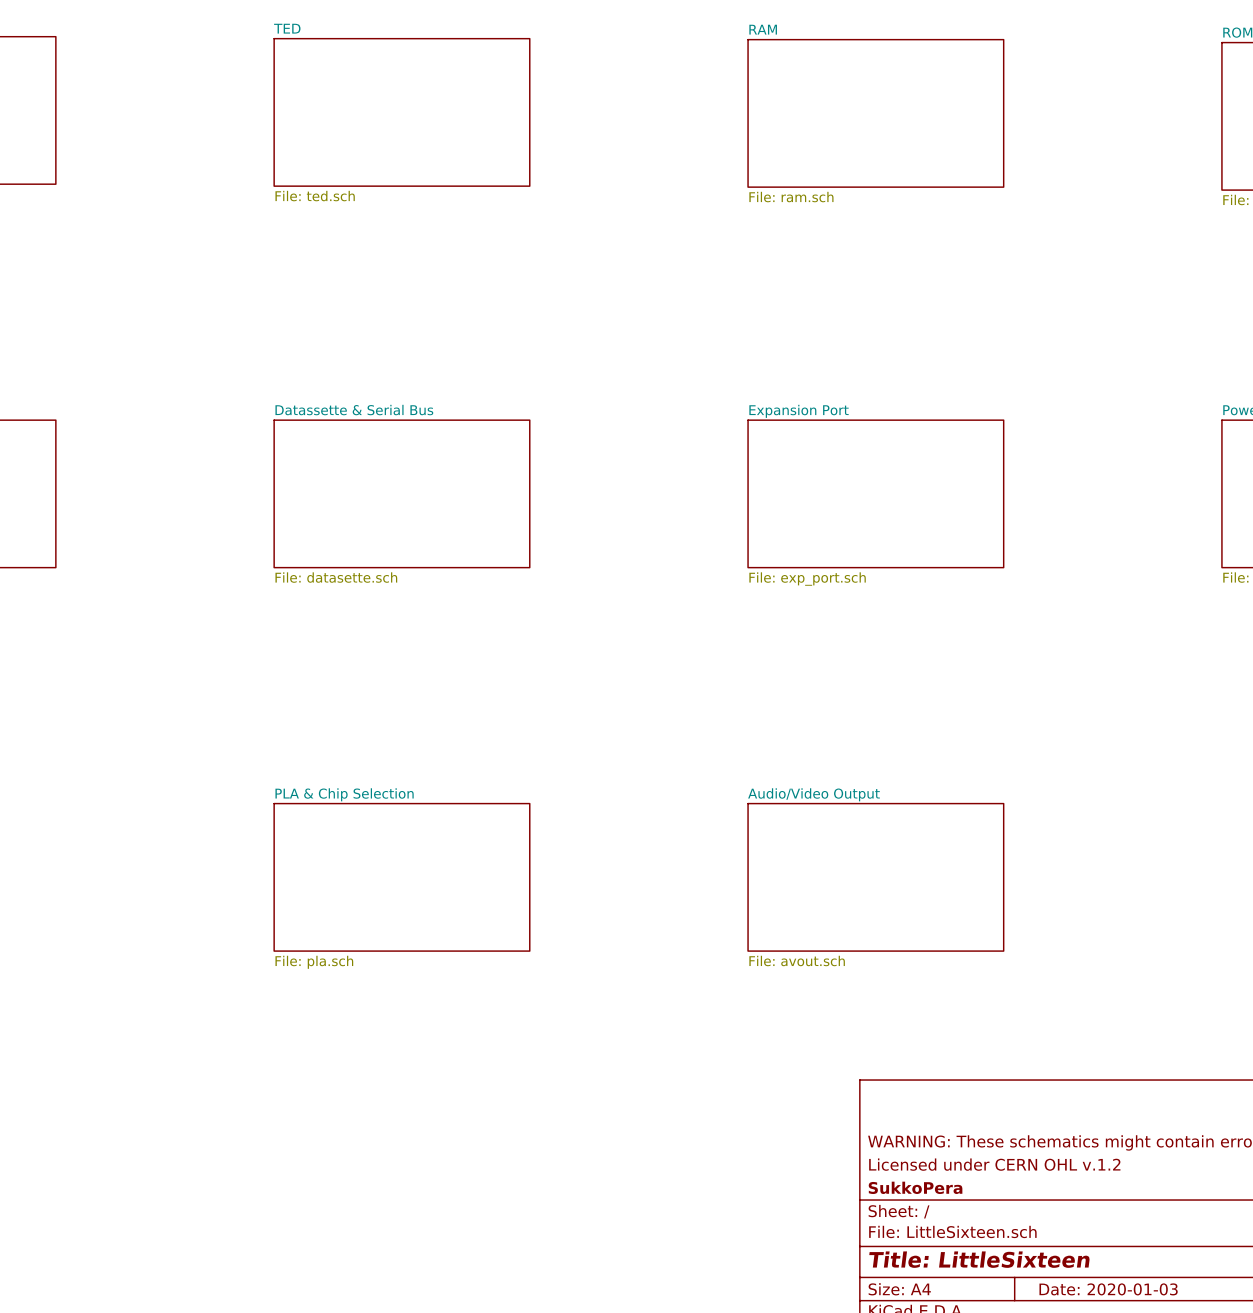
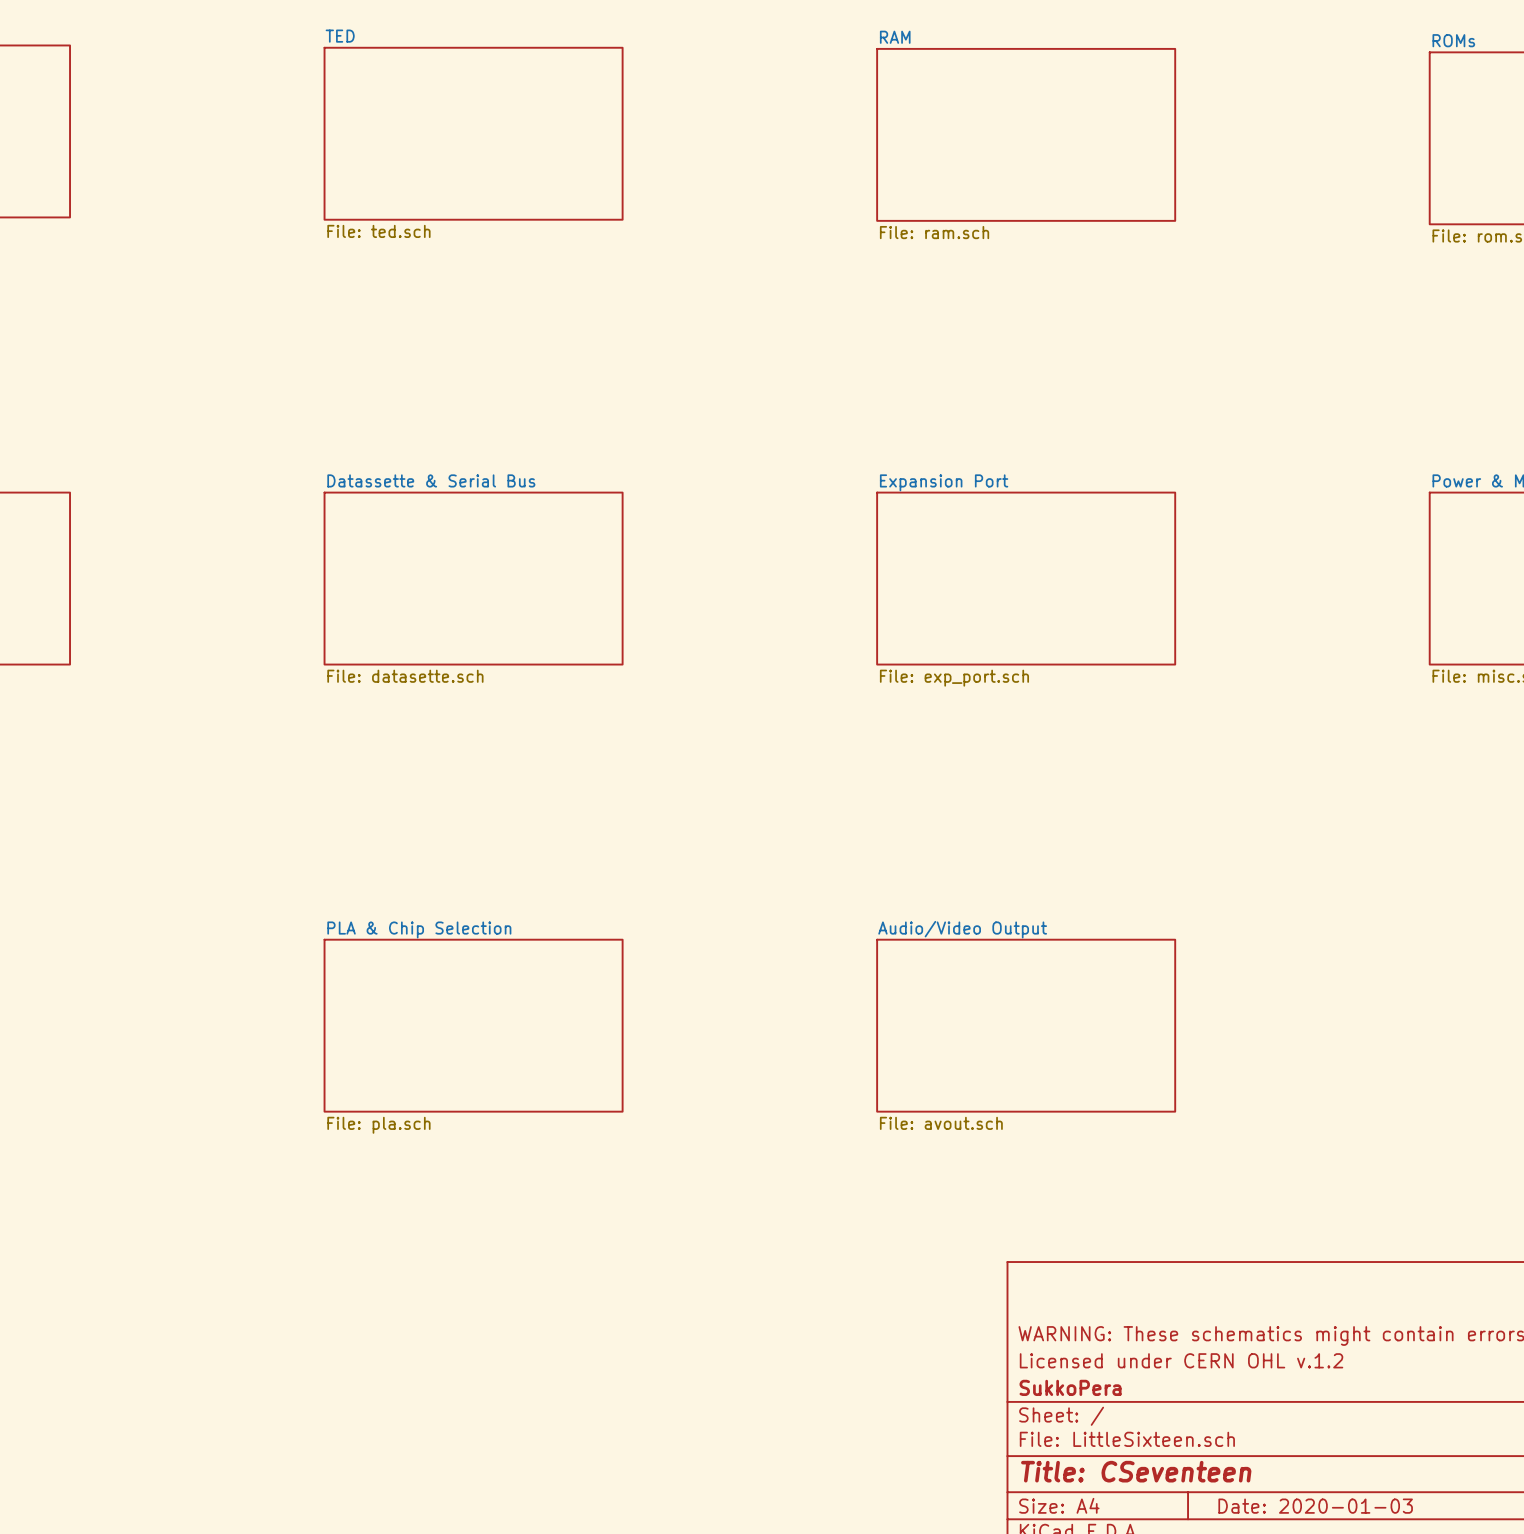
title block: Title: LittleSixteen (979, 1259) -> Title: CSeventeen (1136, 1471)

